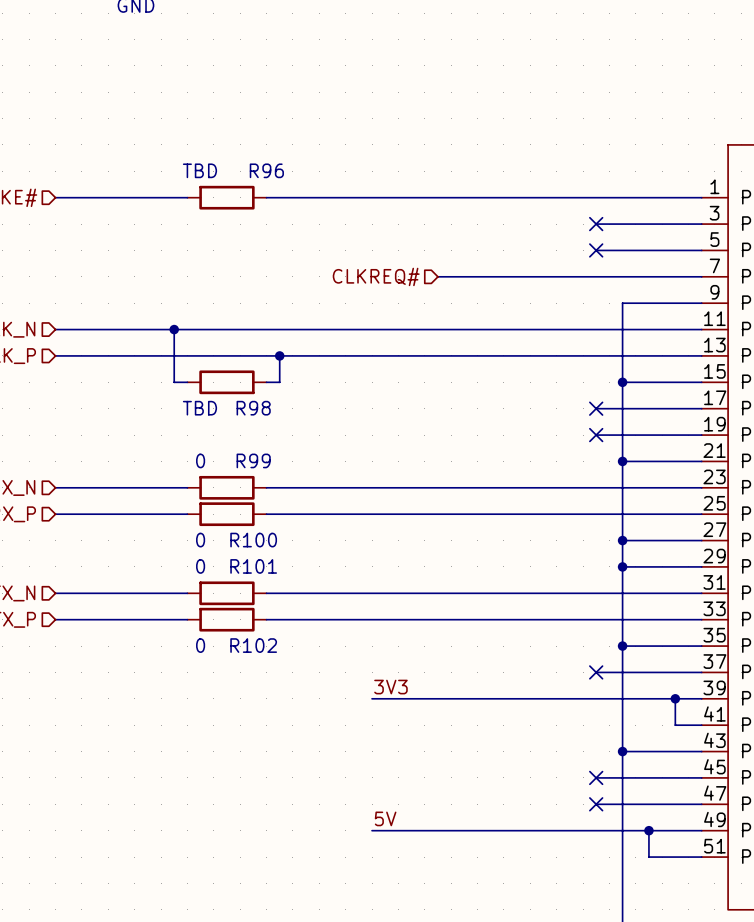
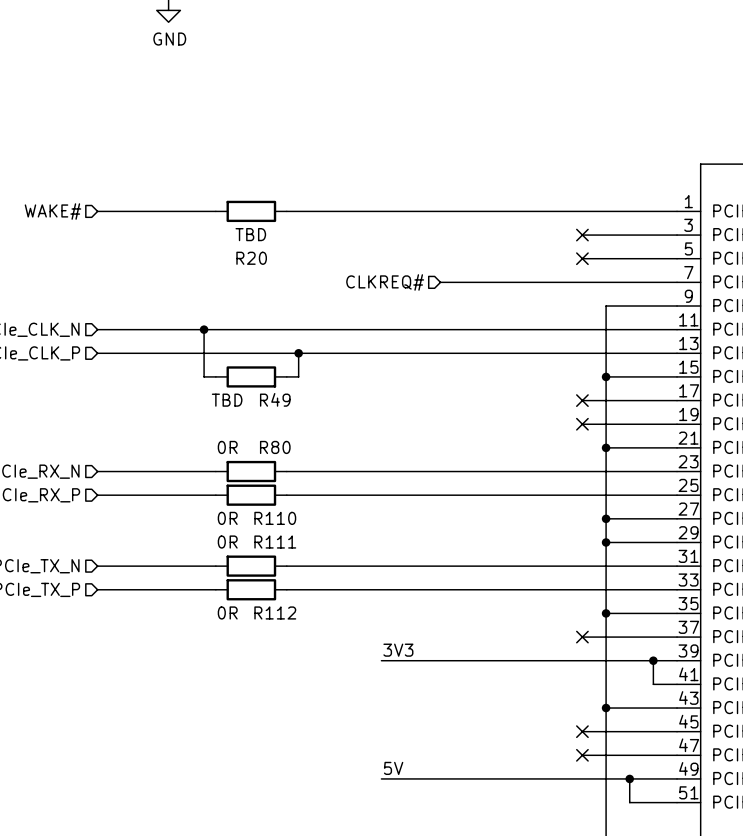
R96 value position: TBD (199, 170) -> TBD (250, 234)
R96 name: R96 (266, 170) -> R20 (251, 258)
R98 name: R98 (253, 408) -> R49 (275, 399)
R99 value: 0 (200, 460) -> 0R (227, 447)
R99 name: R99 (253, 460) -> R80 (275, 447)
R100 value: 0 (200, 540) -> 0R (227, 518)
R100 name: R100 (253, 540) -> R110 (275, 518)
R101 value: 0 (200, 566) -> 0R (227, 542)
R101 name: R101 (253, 566) -> R111 (275, 542)
R102 value: 0 (200, 645) -> 0R (227, 612)
R102 name: R102 (253, 645) -> R112 (275, 612)

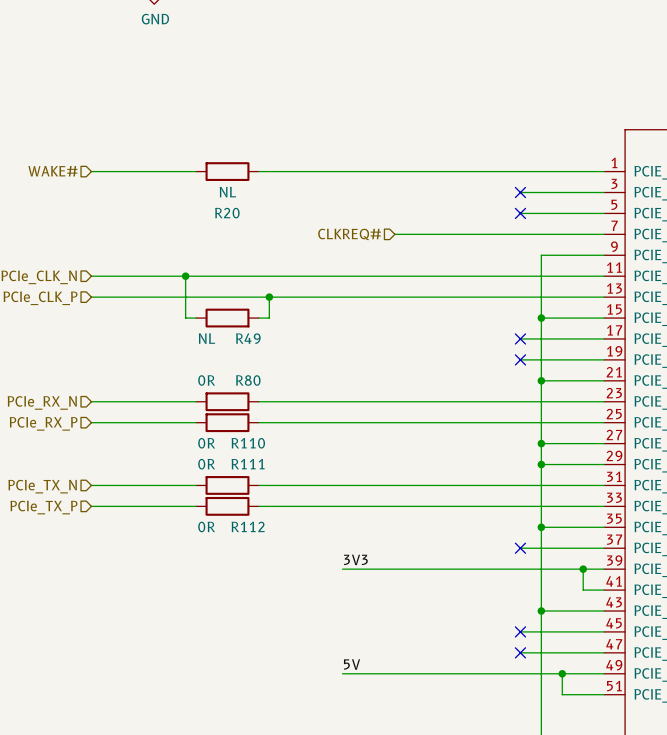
R20 value: TBD (250, 234) -> NL (227, 192)
R49 value: TBD (227, 400) -> NL (206, 338)

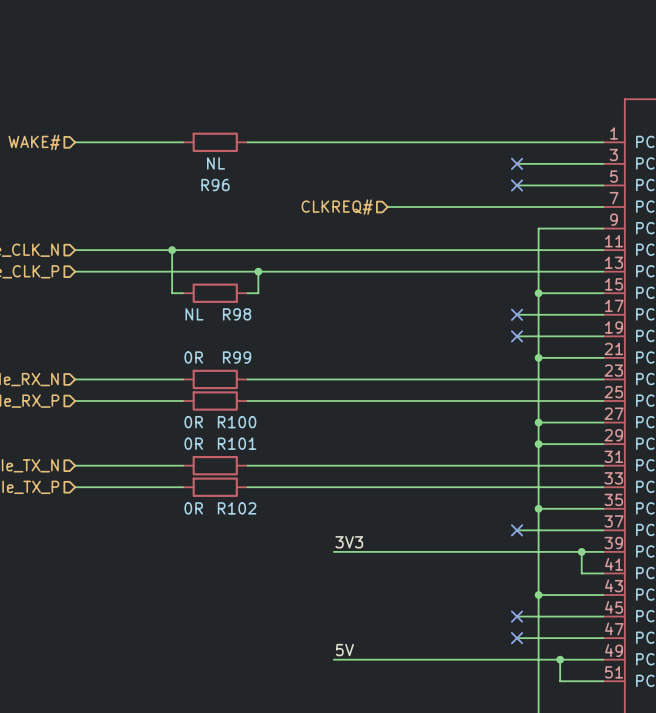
R20 name: R20 (227, 213) -> R96 (215, 185)
R49 name: R49 (248, 338) -> R98 (237, 314)
R80 name: R80 (248, 380) -> R99 (237, 357)
R110 name: R110 (248, 443) -> R100 (237, 422)
R111 name: R111 (248, 464) -> R101 (237, 443)
R112 name: R112 (248, 526) -> R102 (237, 508)

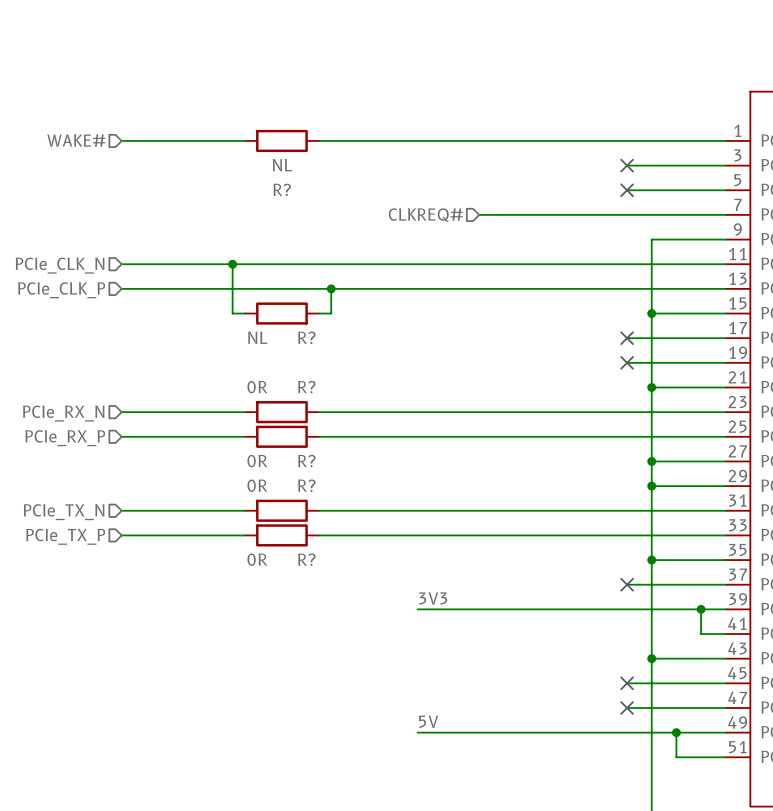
R96 name: R96 (215, 185) -> R? (282, 189)
R98 name: R98 (237, 314) -> R? (306, 337)
R99 name: R99 (237, 357) -> R? (306, 387)
R100 name: R100 (237, 422) -> R? (306, 461)
R101 name: R101 (237, 443) -> R? (306, 485)
R102 name: R102 (237, 508) -> R? (306, 559)

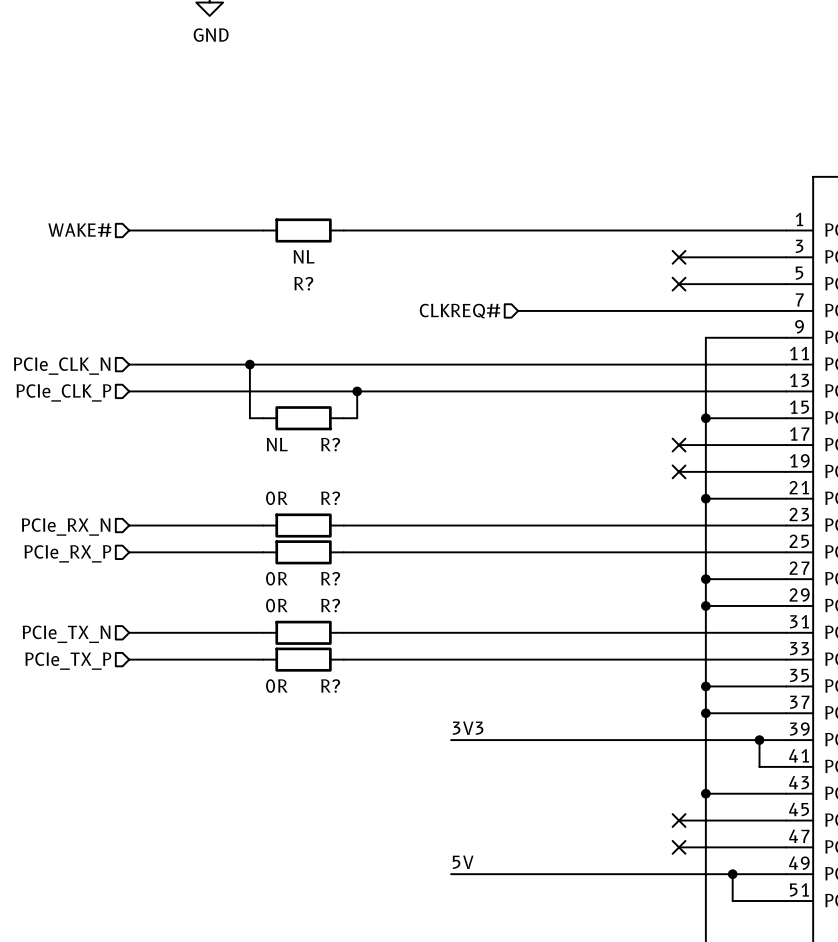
wire: (627, 584) (651, 584) -> none
no-connect mark: (627, 584) -> none
junction: none -> (705, 713)

